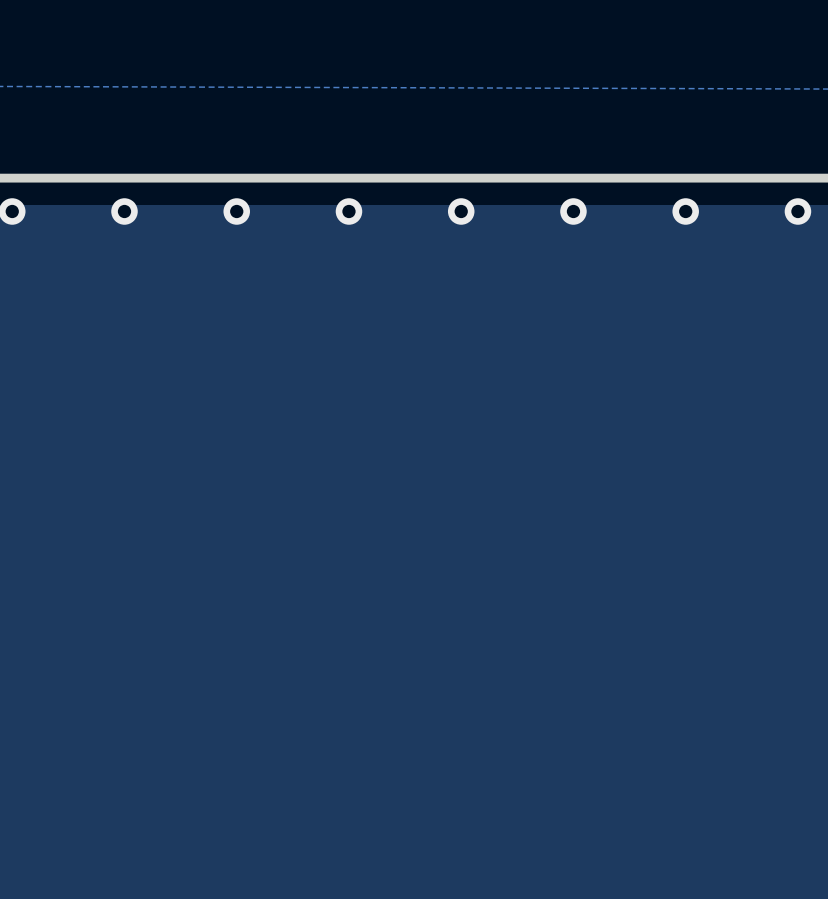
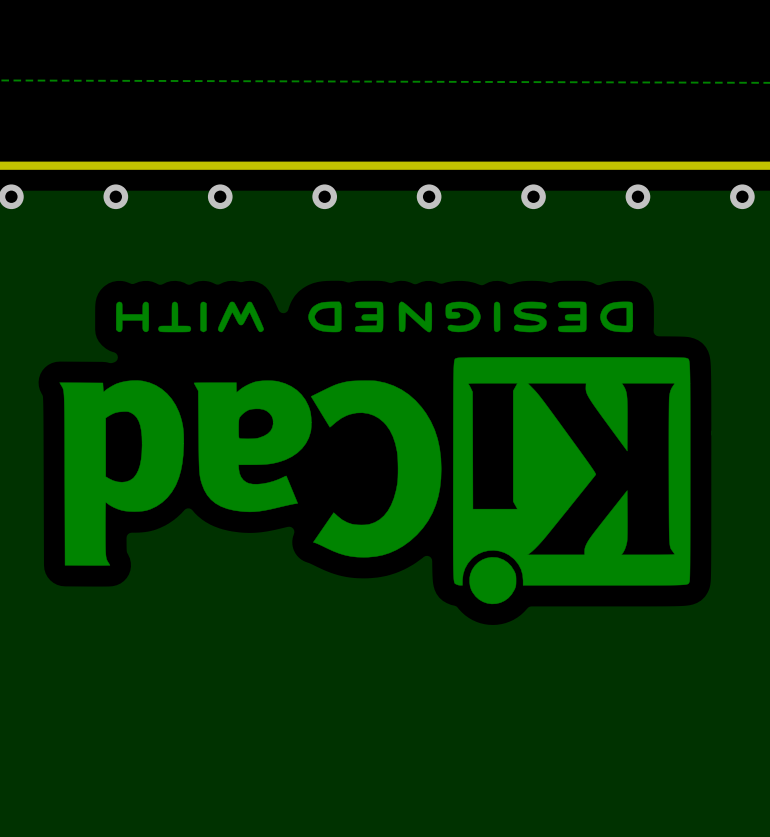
drawing: none -> [59, 301, 691, 605]

